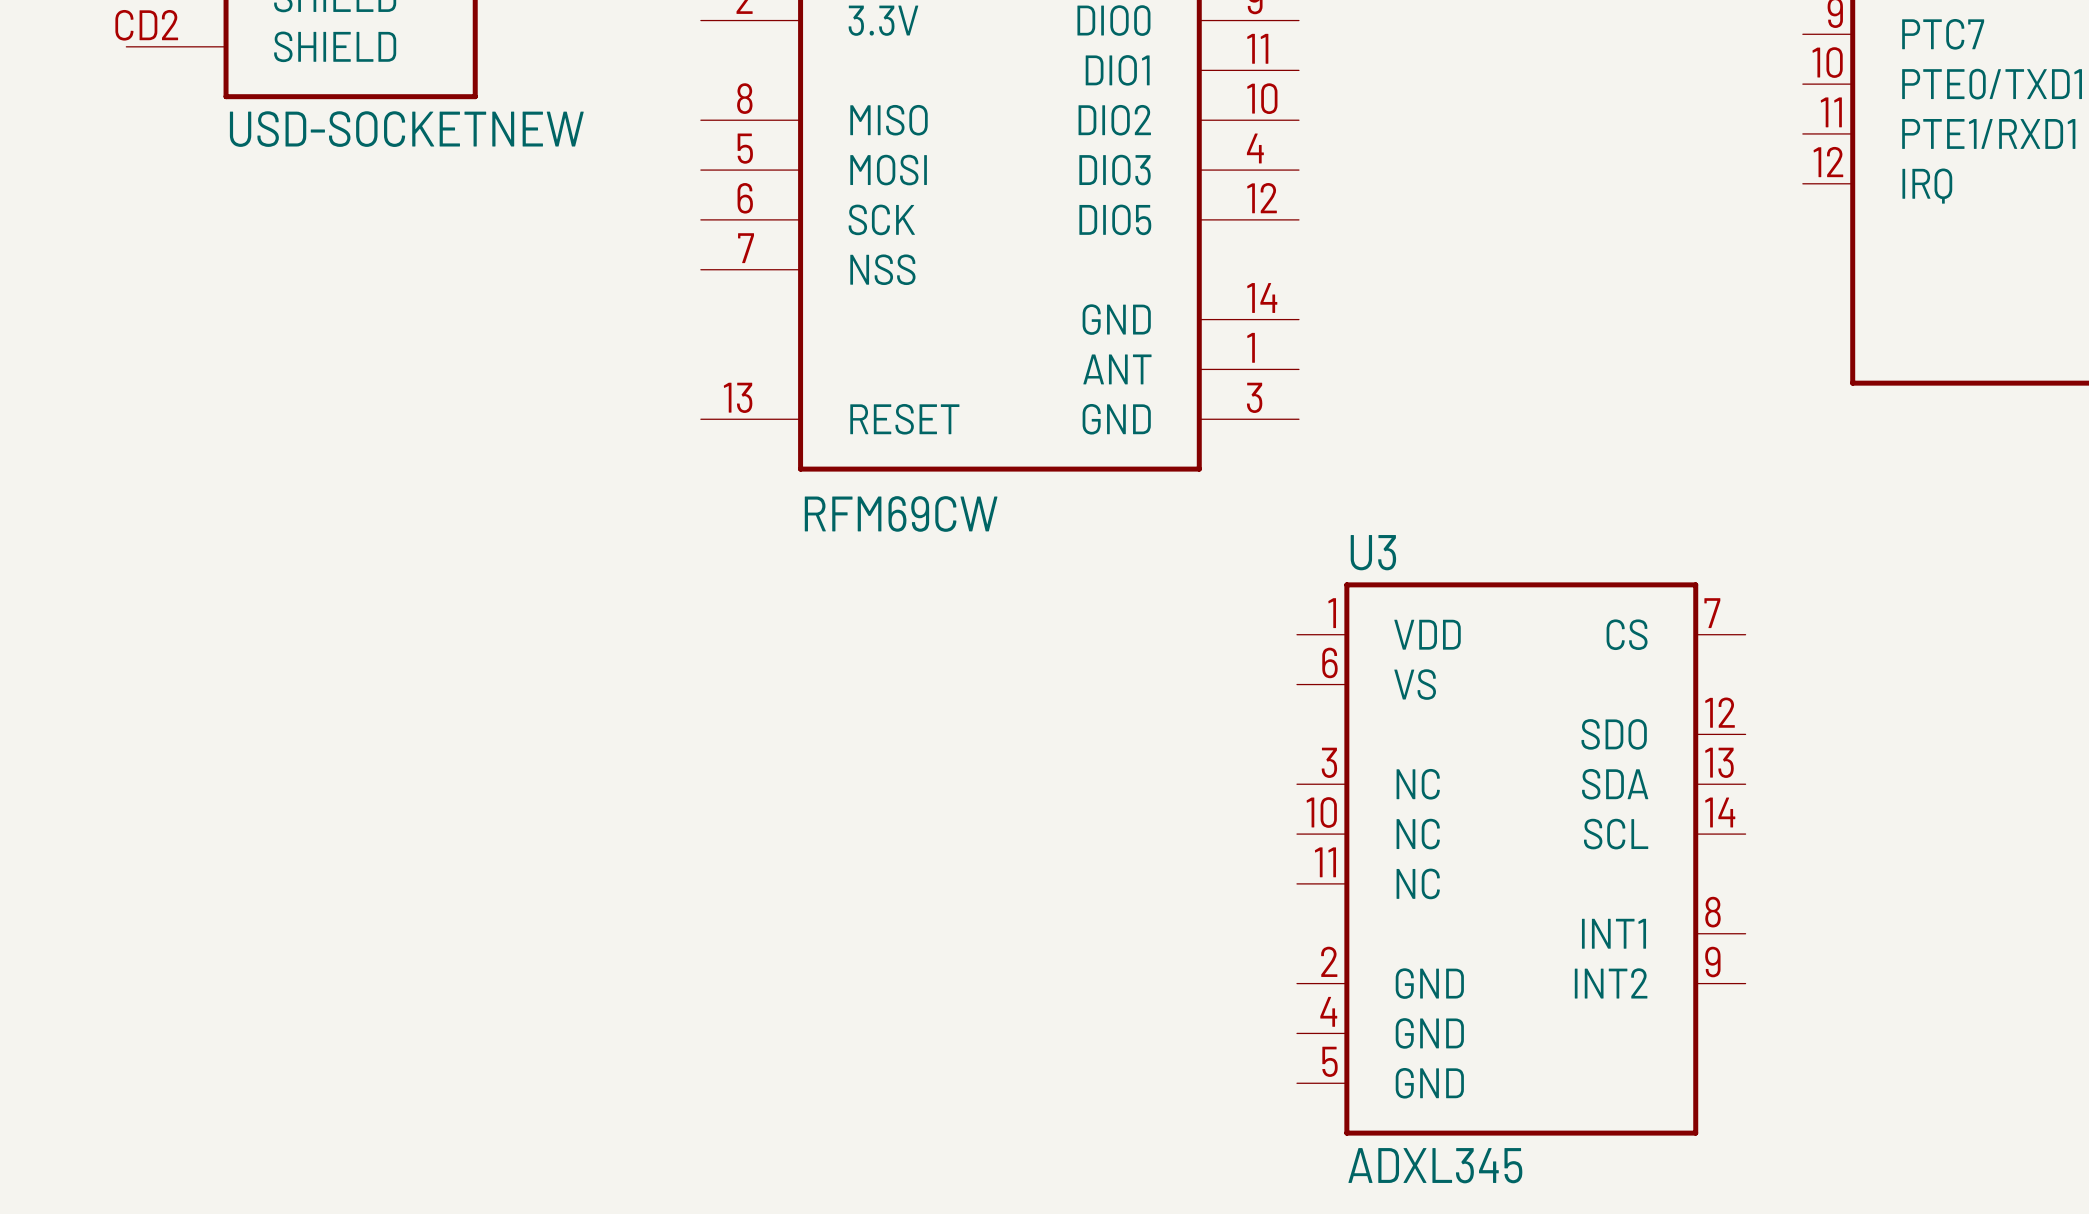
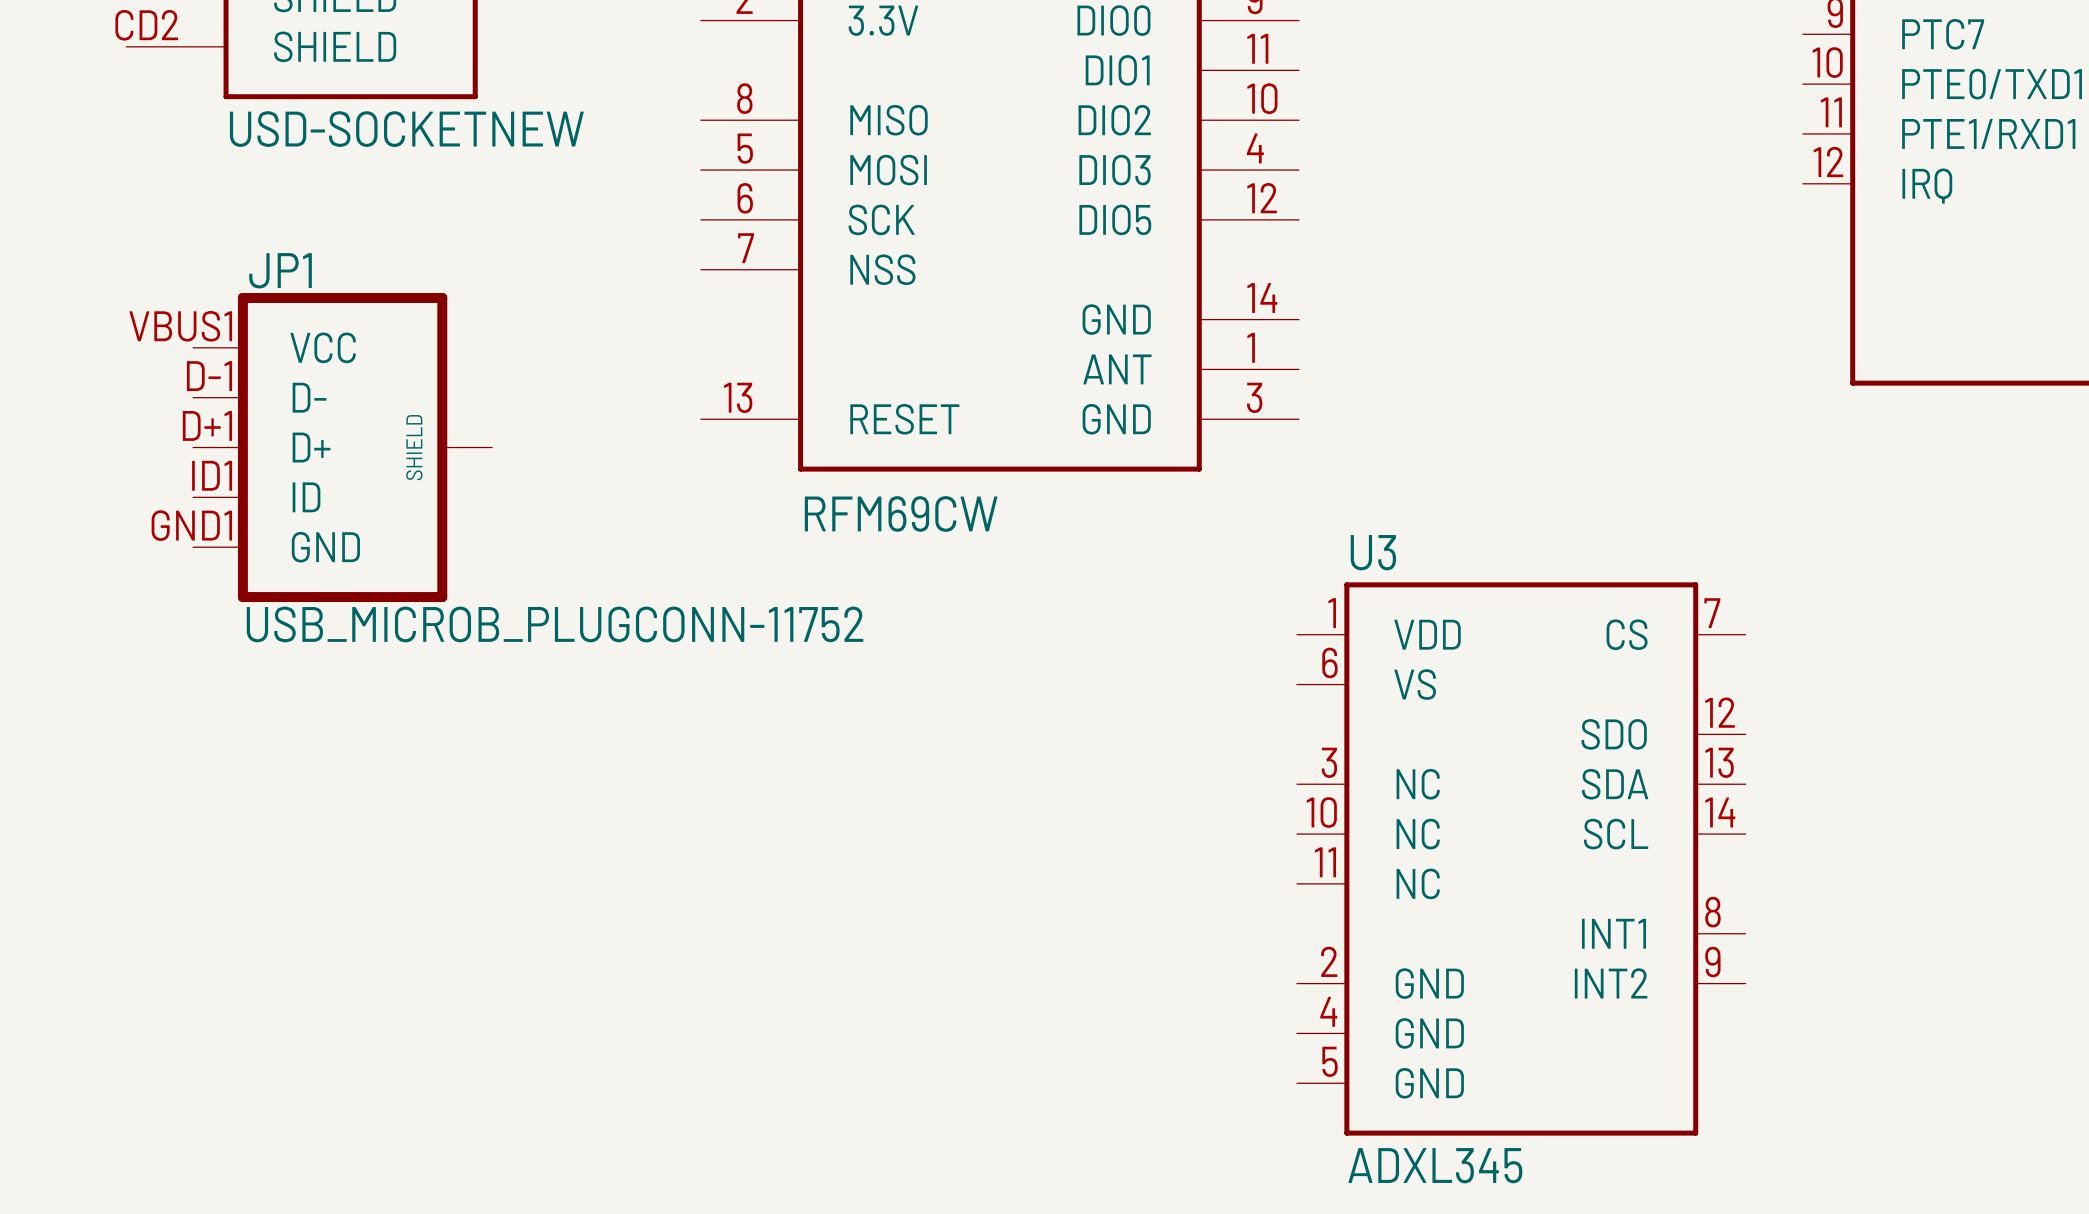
JP1: none -> USB_MICROB_PLUGCONN-11752 (342, 447)

